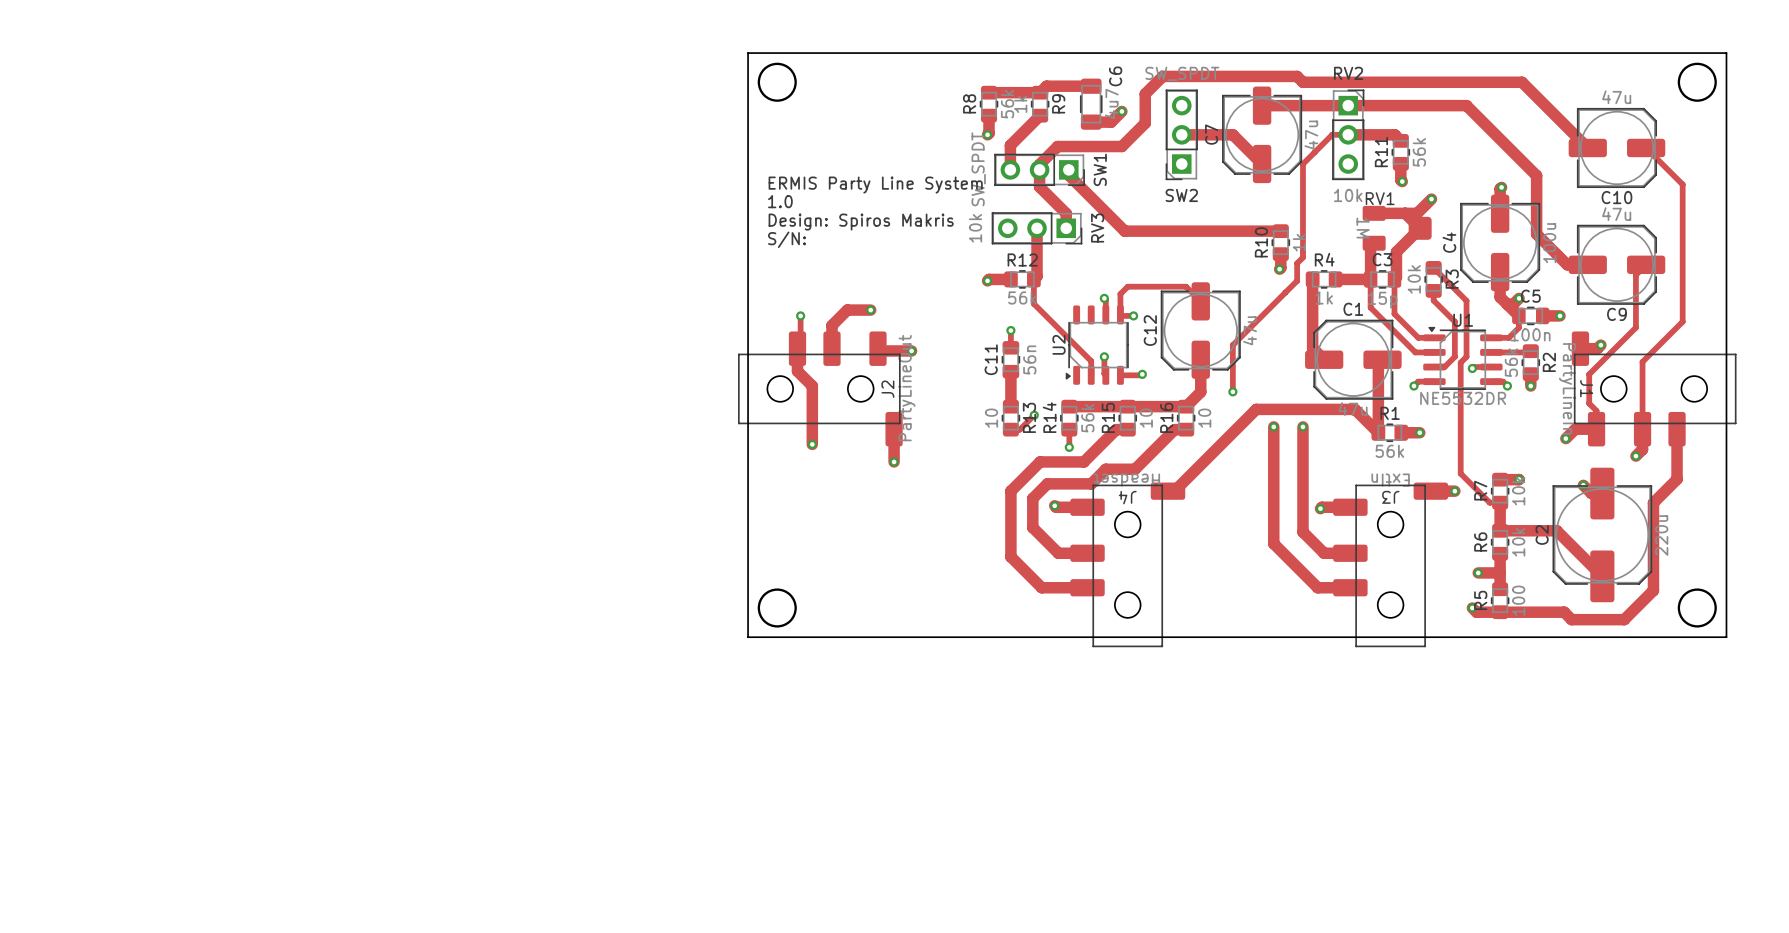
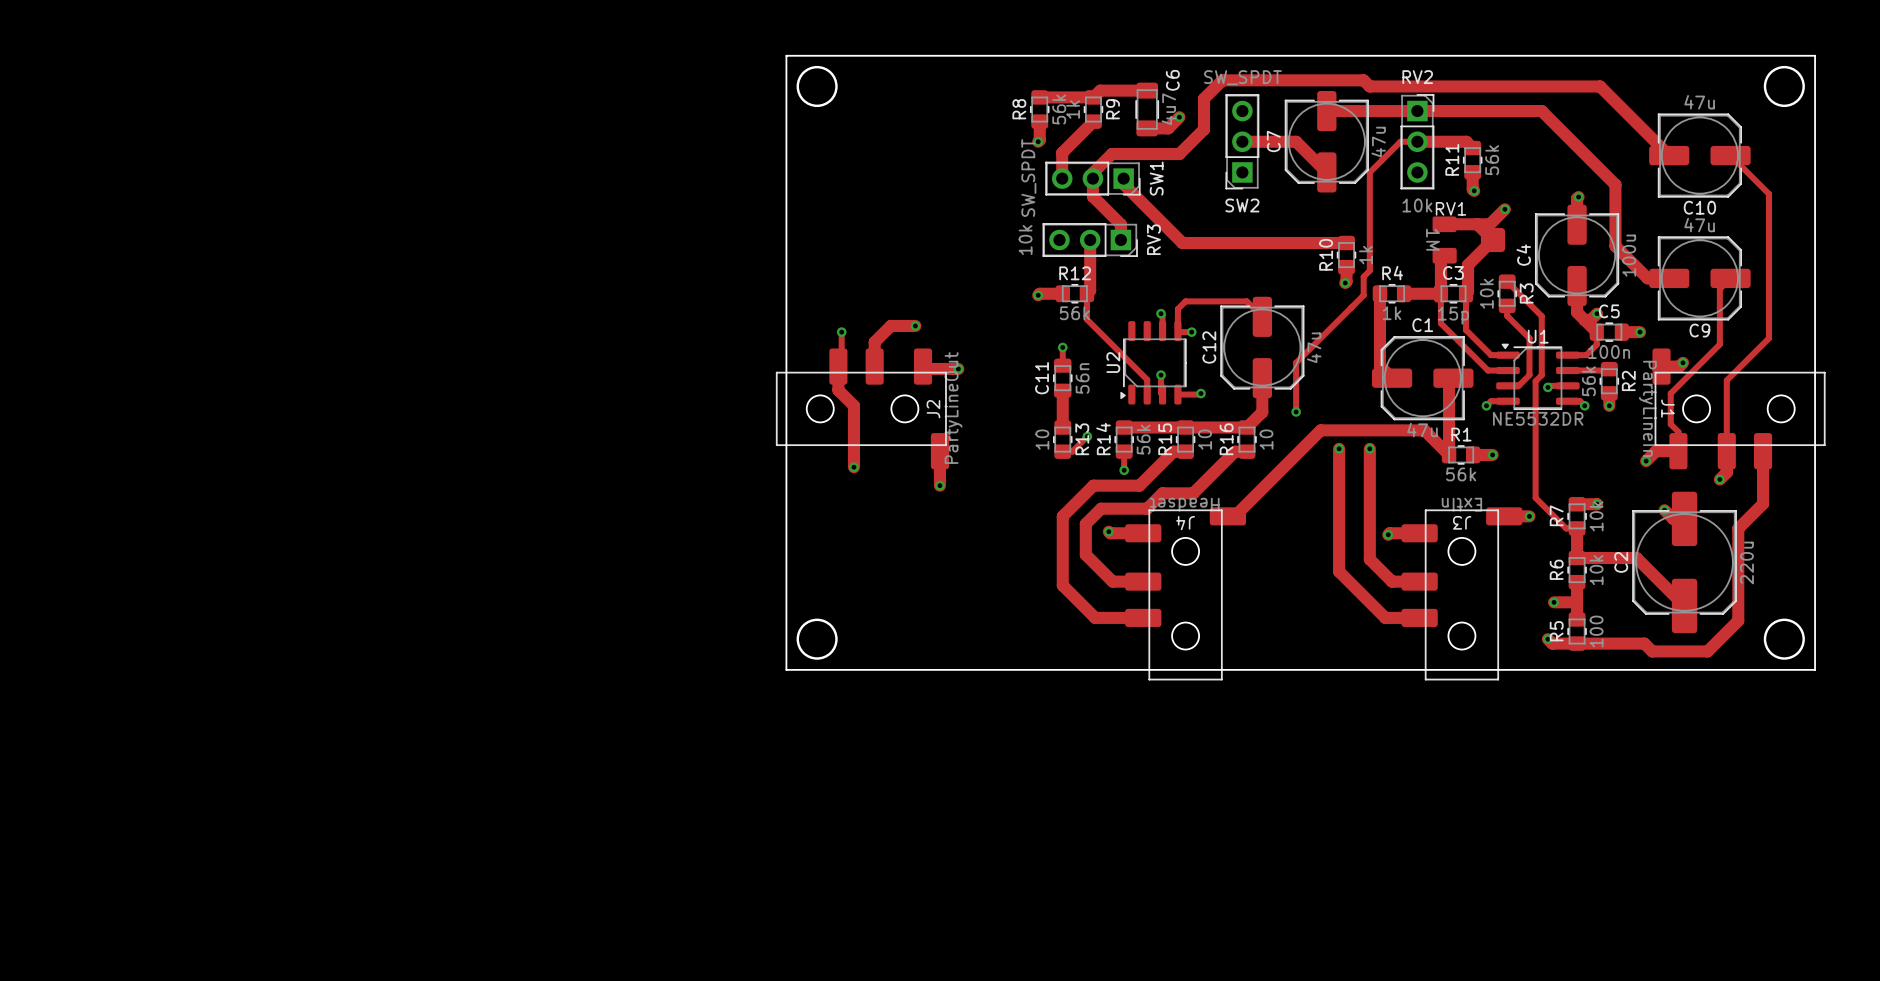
text: ERMIS Party Line System (875, 185) -> none
text: 1.0 (780, 201) -> none
text: Design: Spiros Makris (861, 222) -> none
text: S/N: (786, 239) -> none

